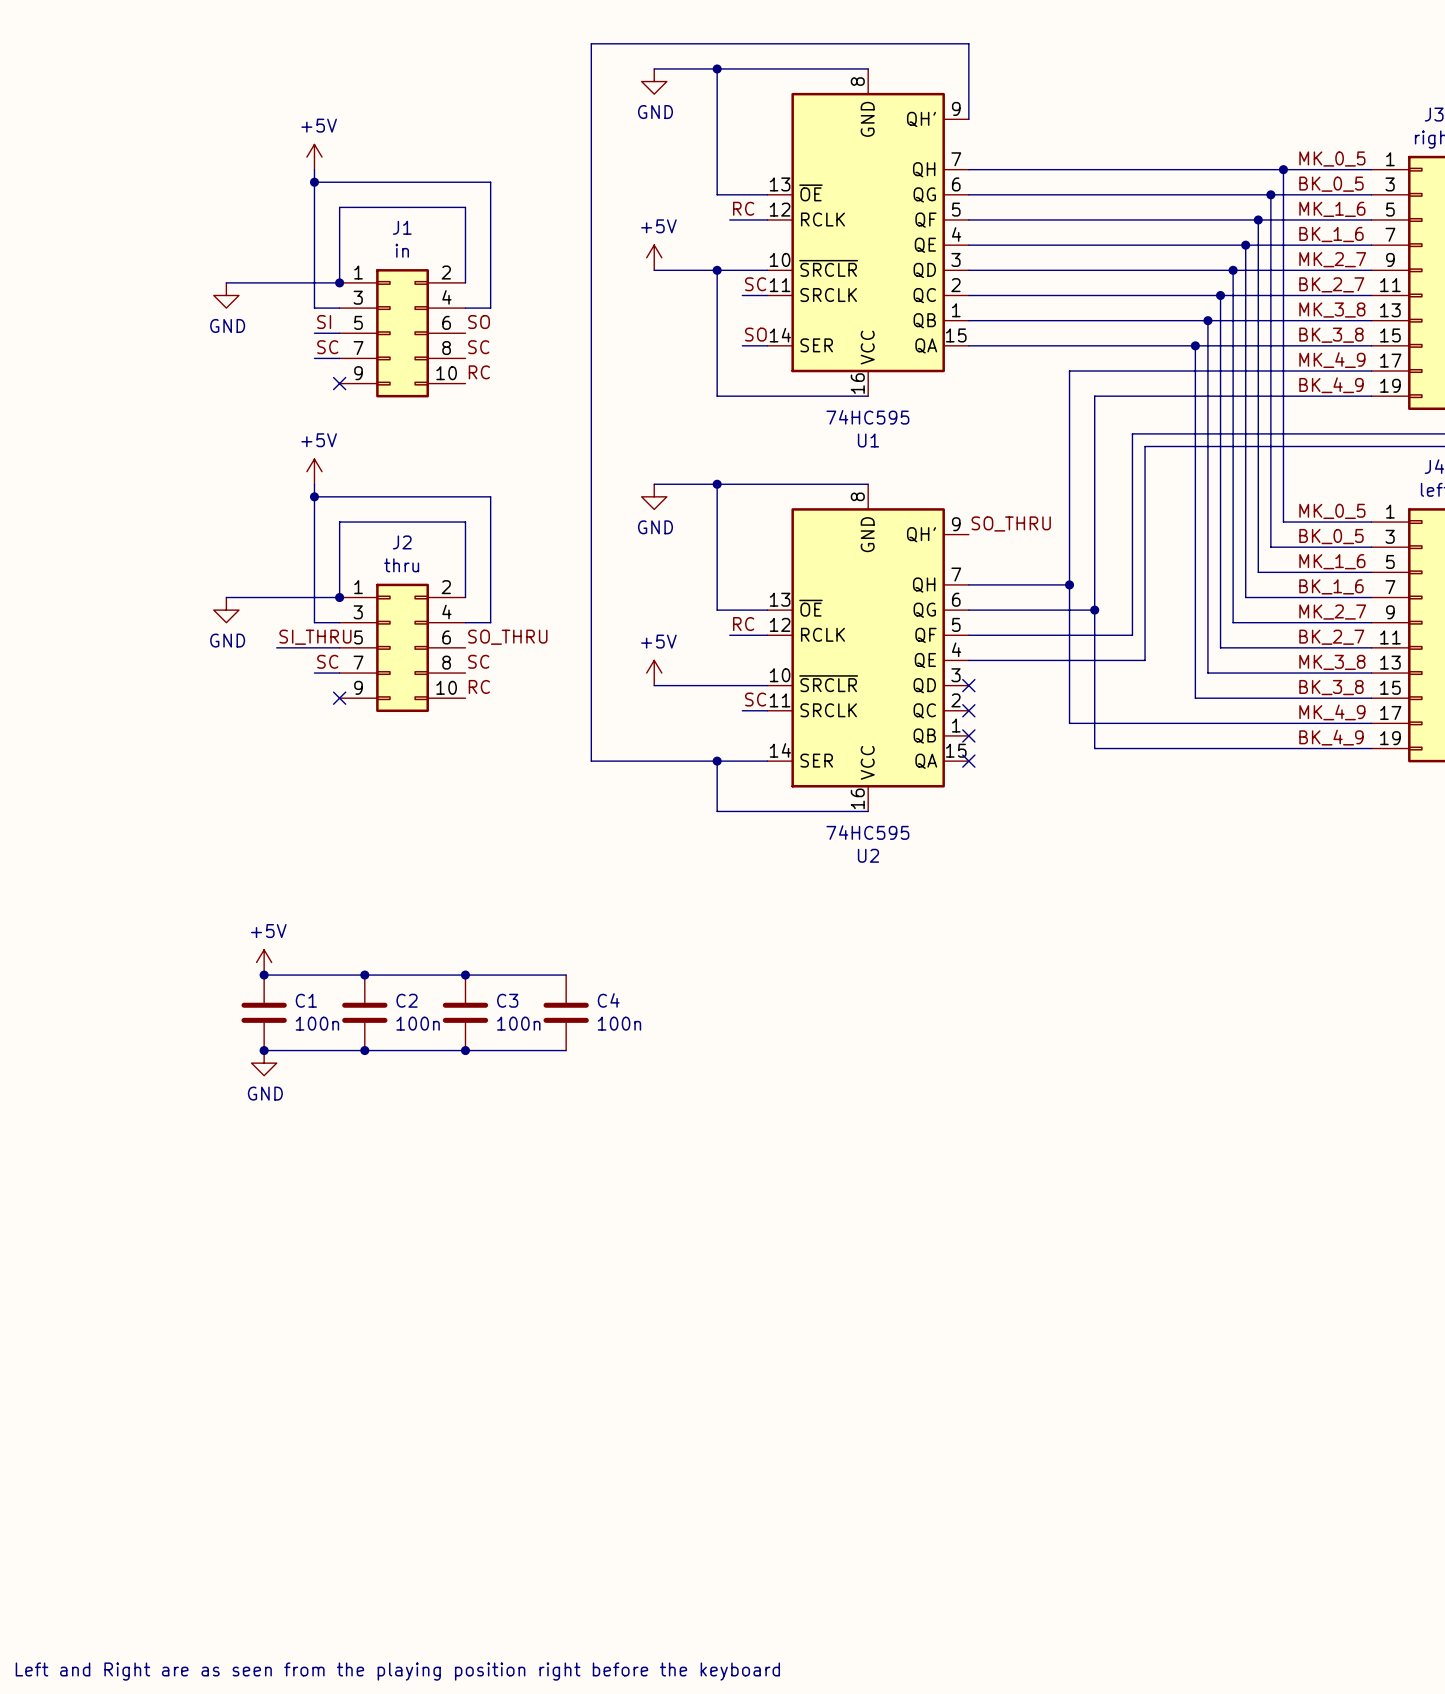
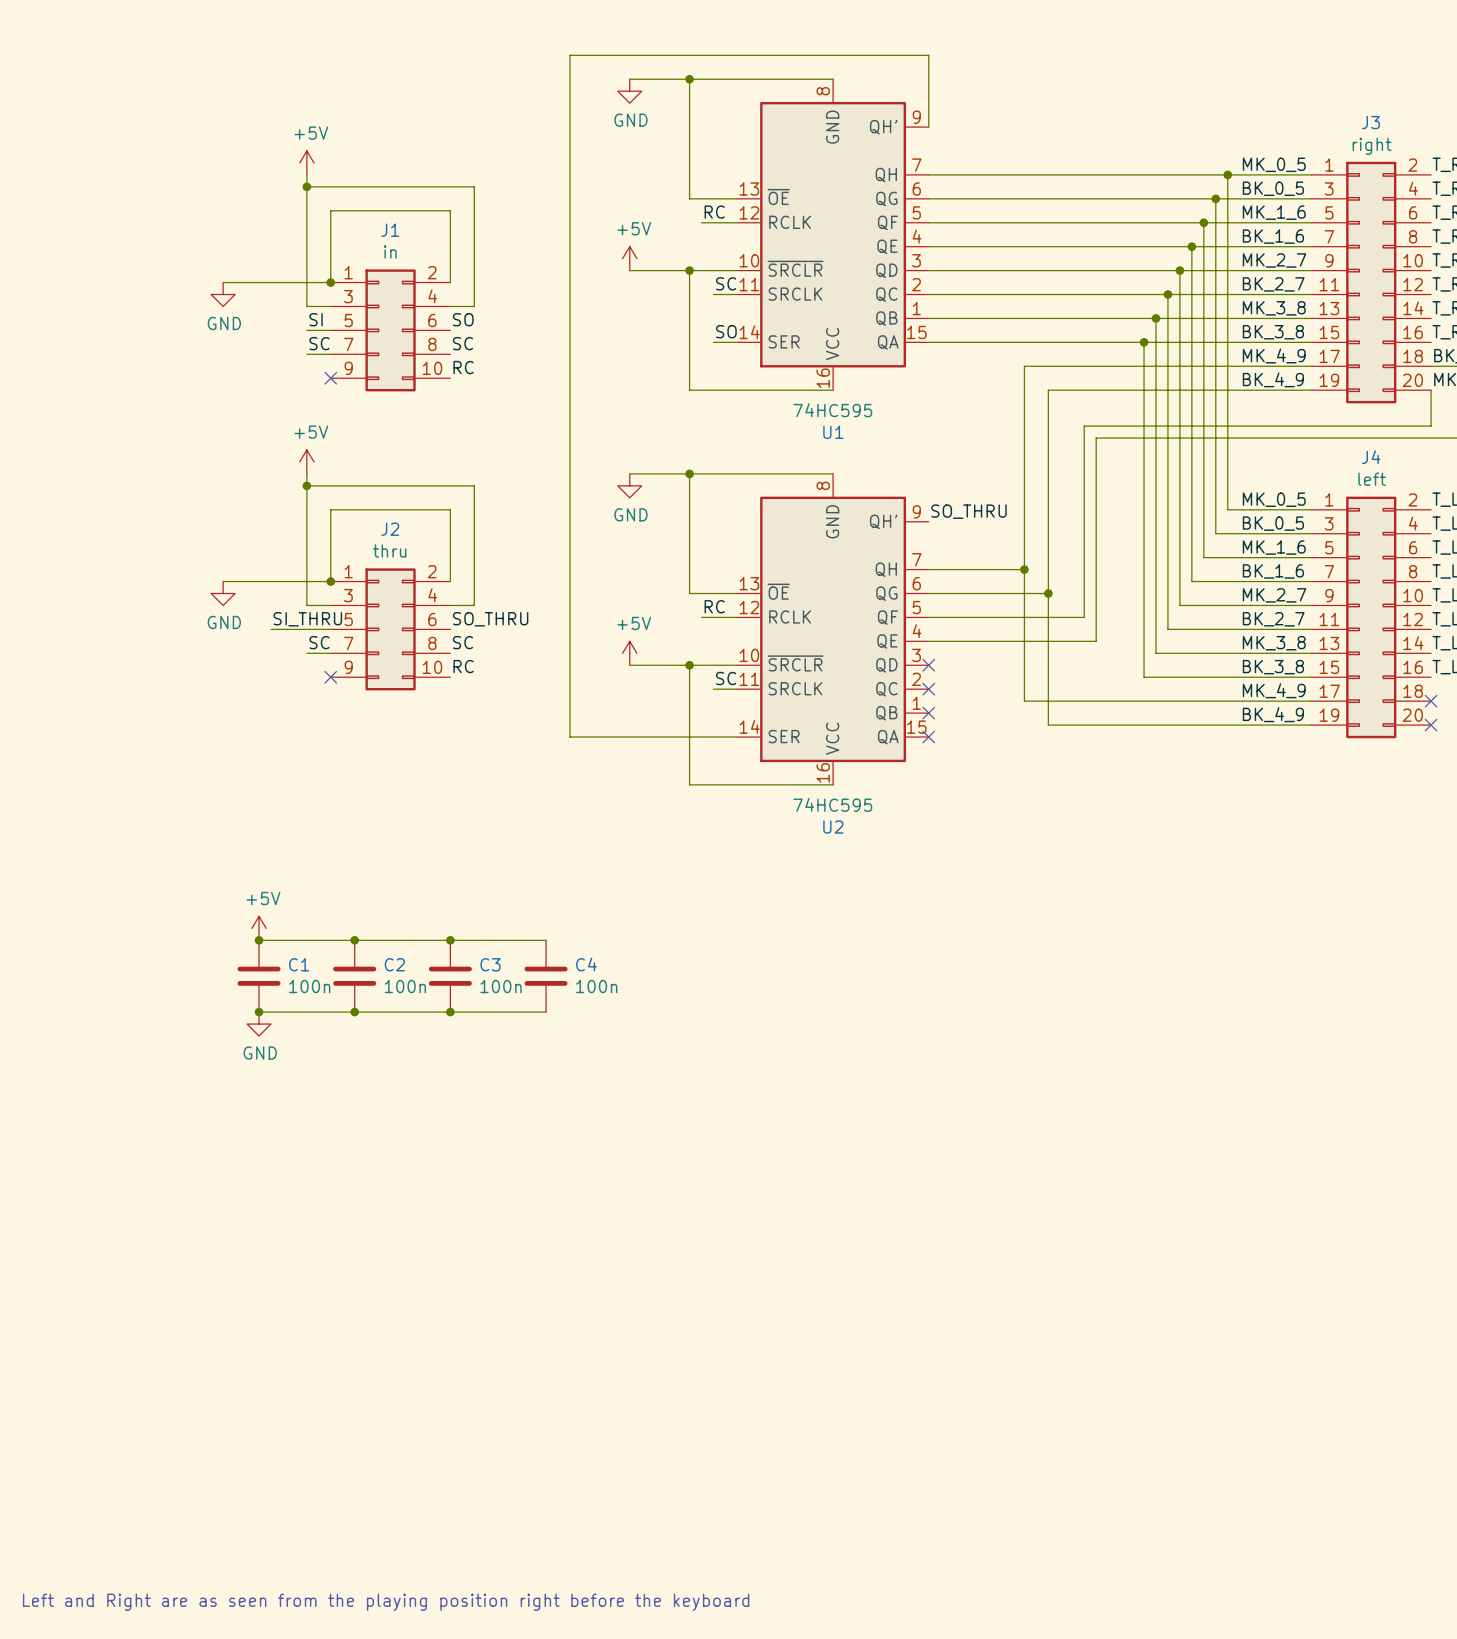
wire: none -> (689, 665) (689, 737)
junction: none -> (689, 665)
junction: (717, 761) -> none

